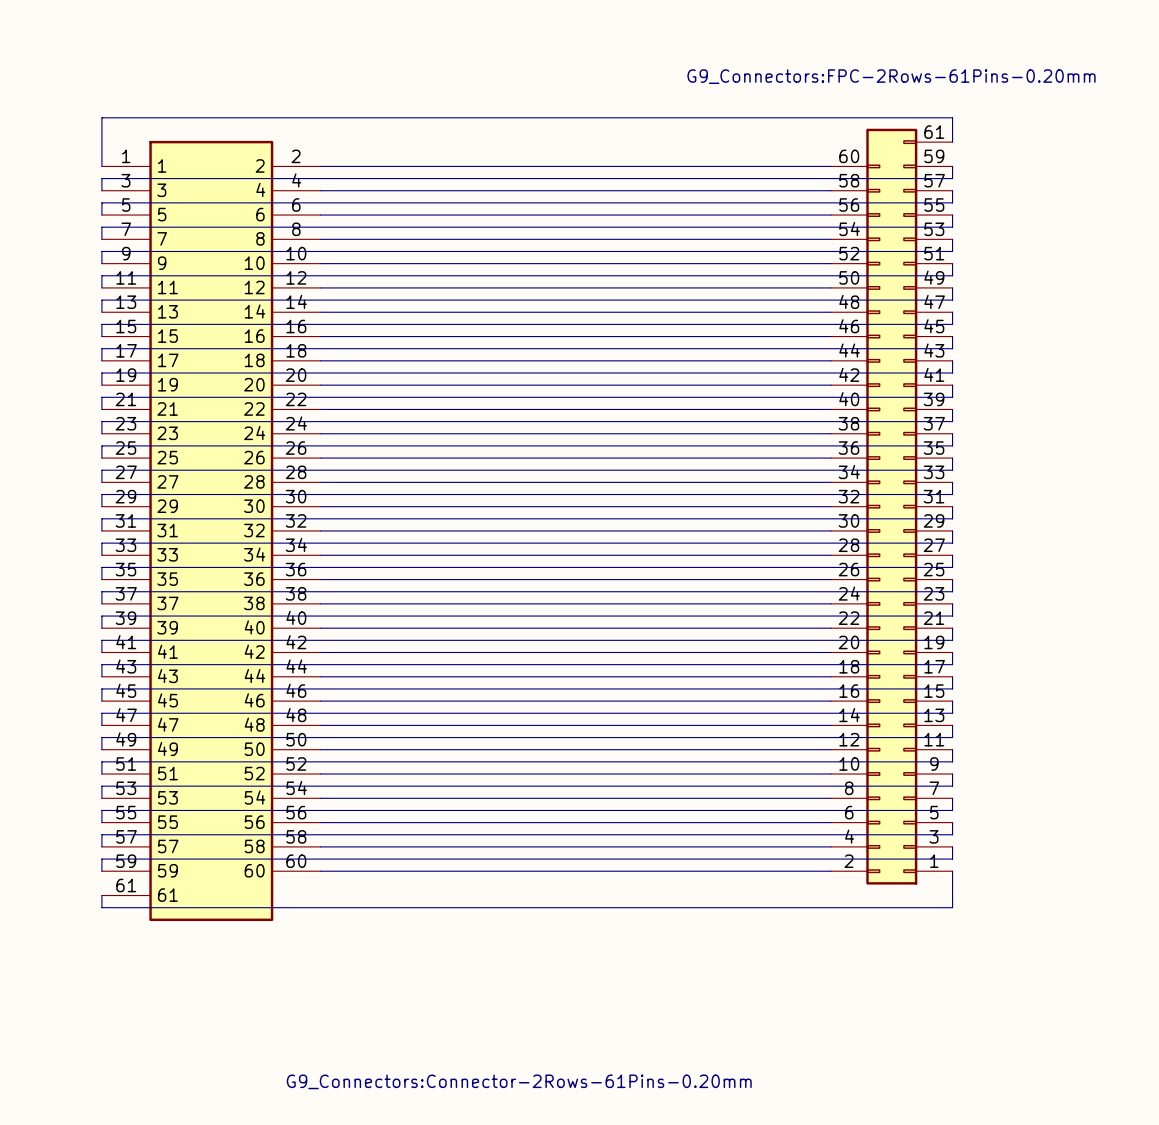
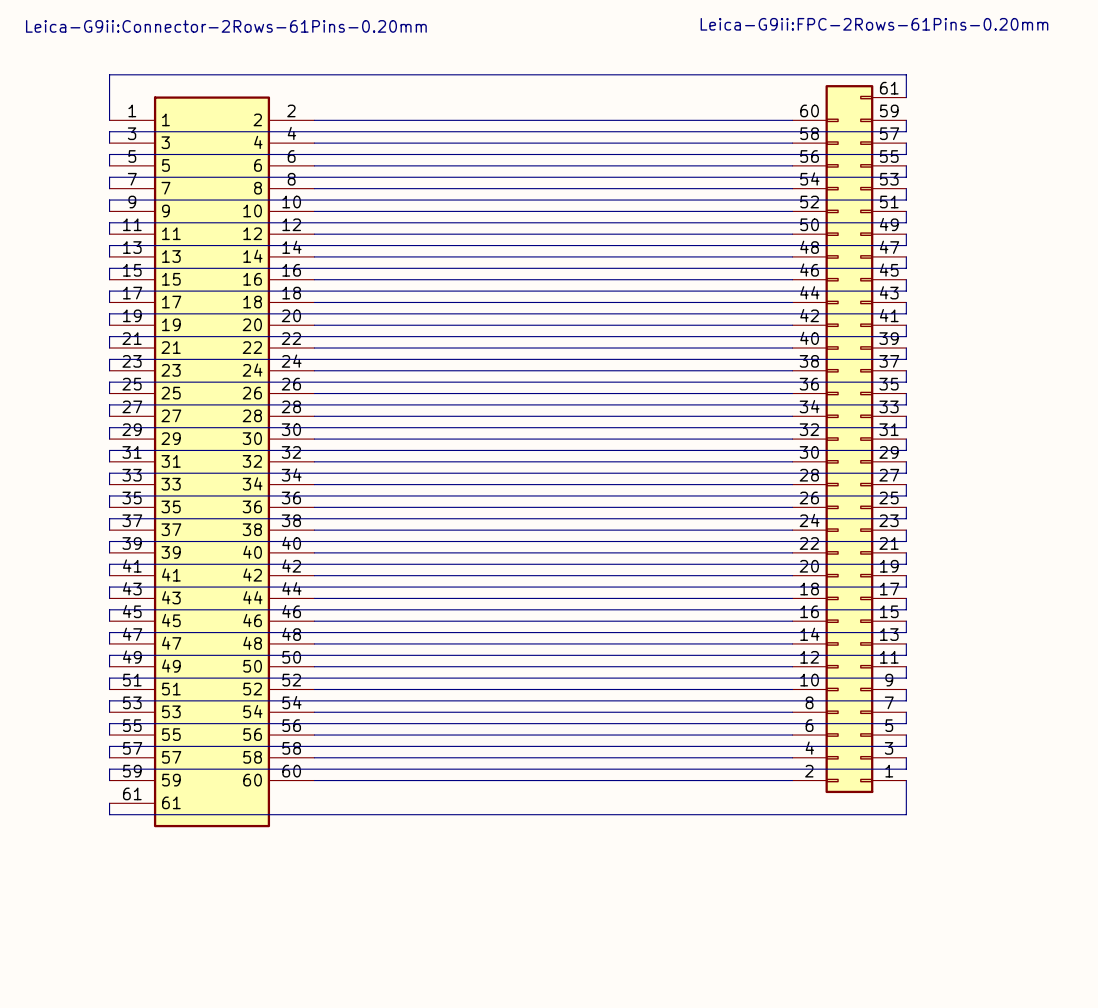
part text: G9_Connectors:FPC-2Rows-61Pins-0.20mm (891, 76) -> Leica-G9ii:FPC-2Rows-61Pins-0.20mm (874, 24)
part text: G9_Connectors:Connector-2Rows-61Pins-0.20mm (519, 1081) -> Leica-G9ii:Connector-2Rows-61Pins-0.20mm (226, 26)

